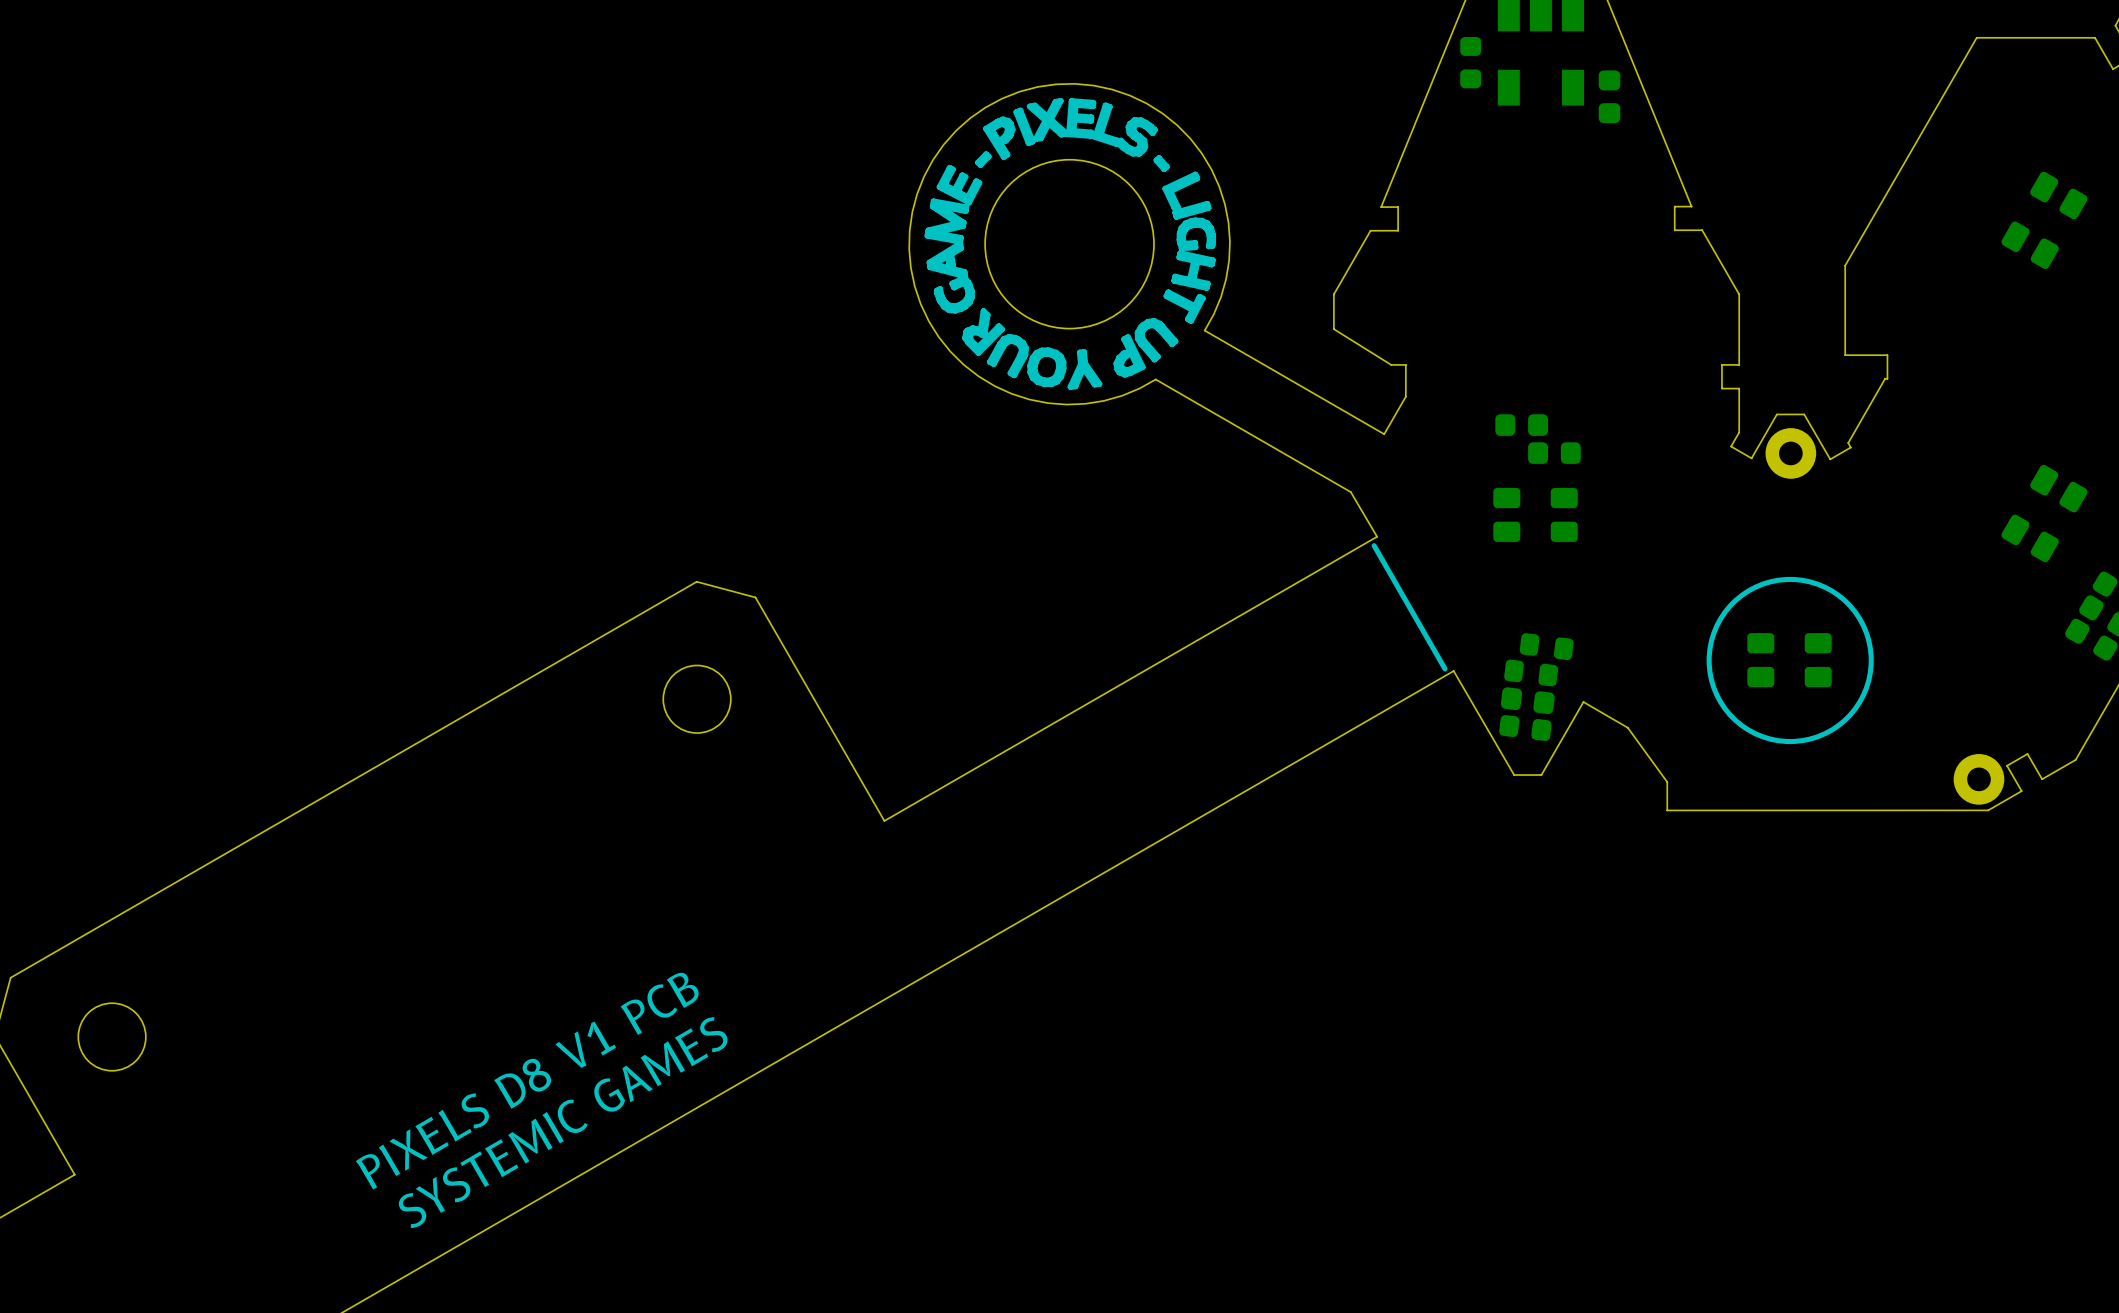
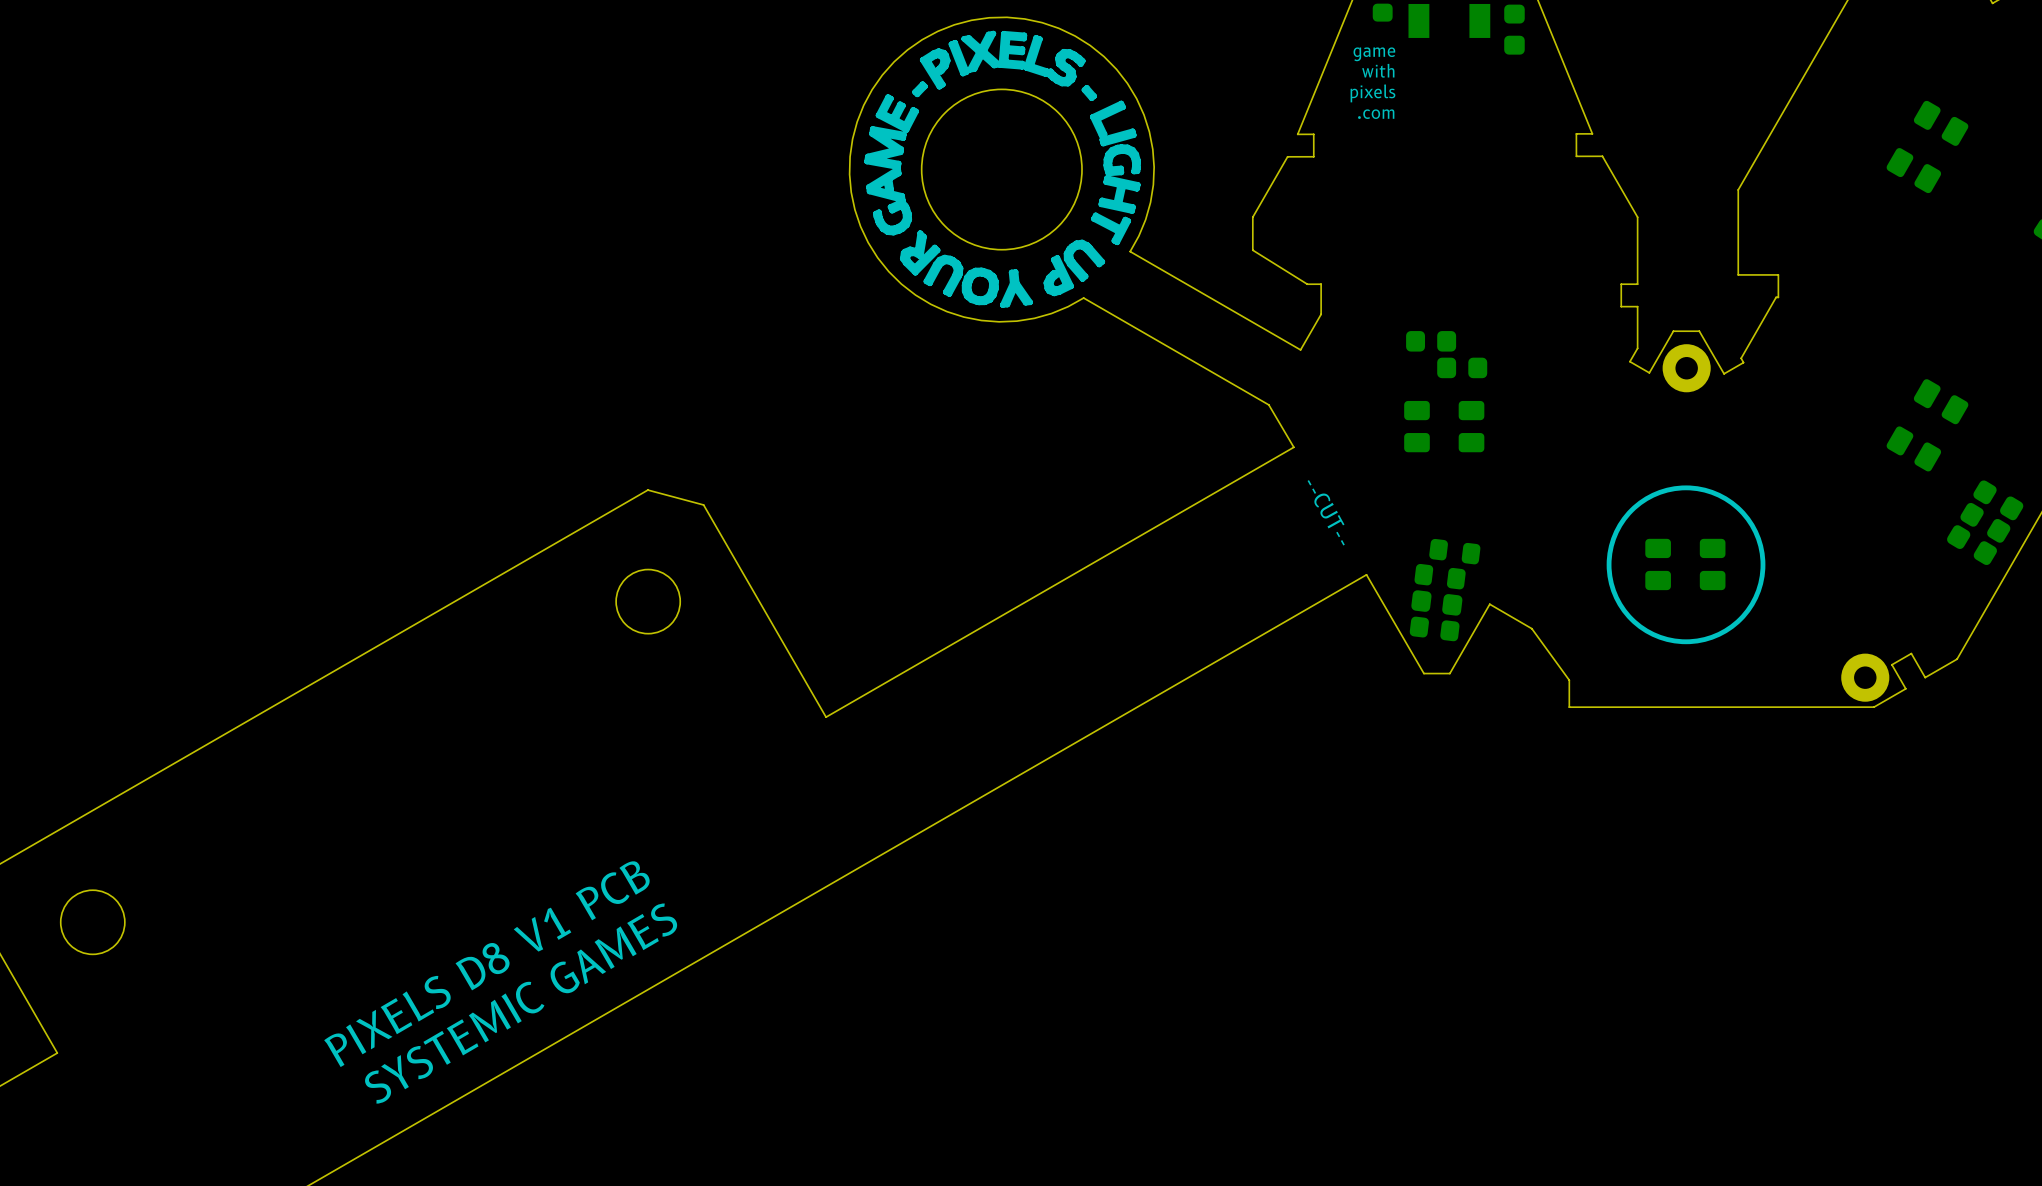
text: none -> game (1374, 54)
text: none -> with (1378, 70)
text: none -> pixels (1372, 93)
text: none -> .com (1376, 114)
line: (1374, 545) (1445, 668) -> none
text: none -> --CUT-- (1326, 512)

